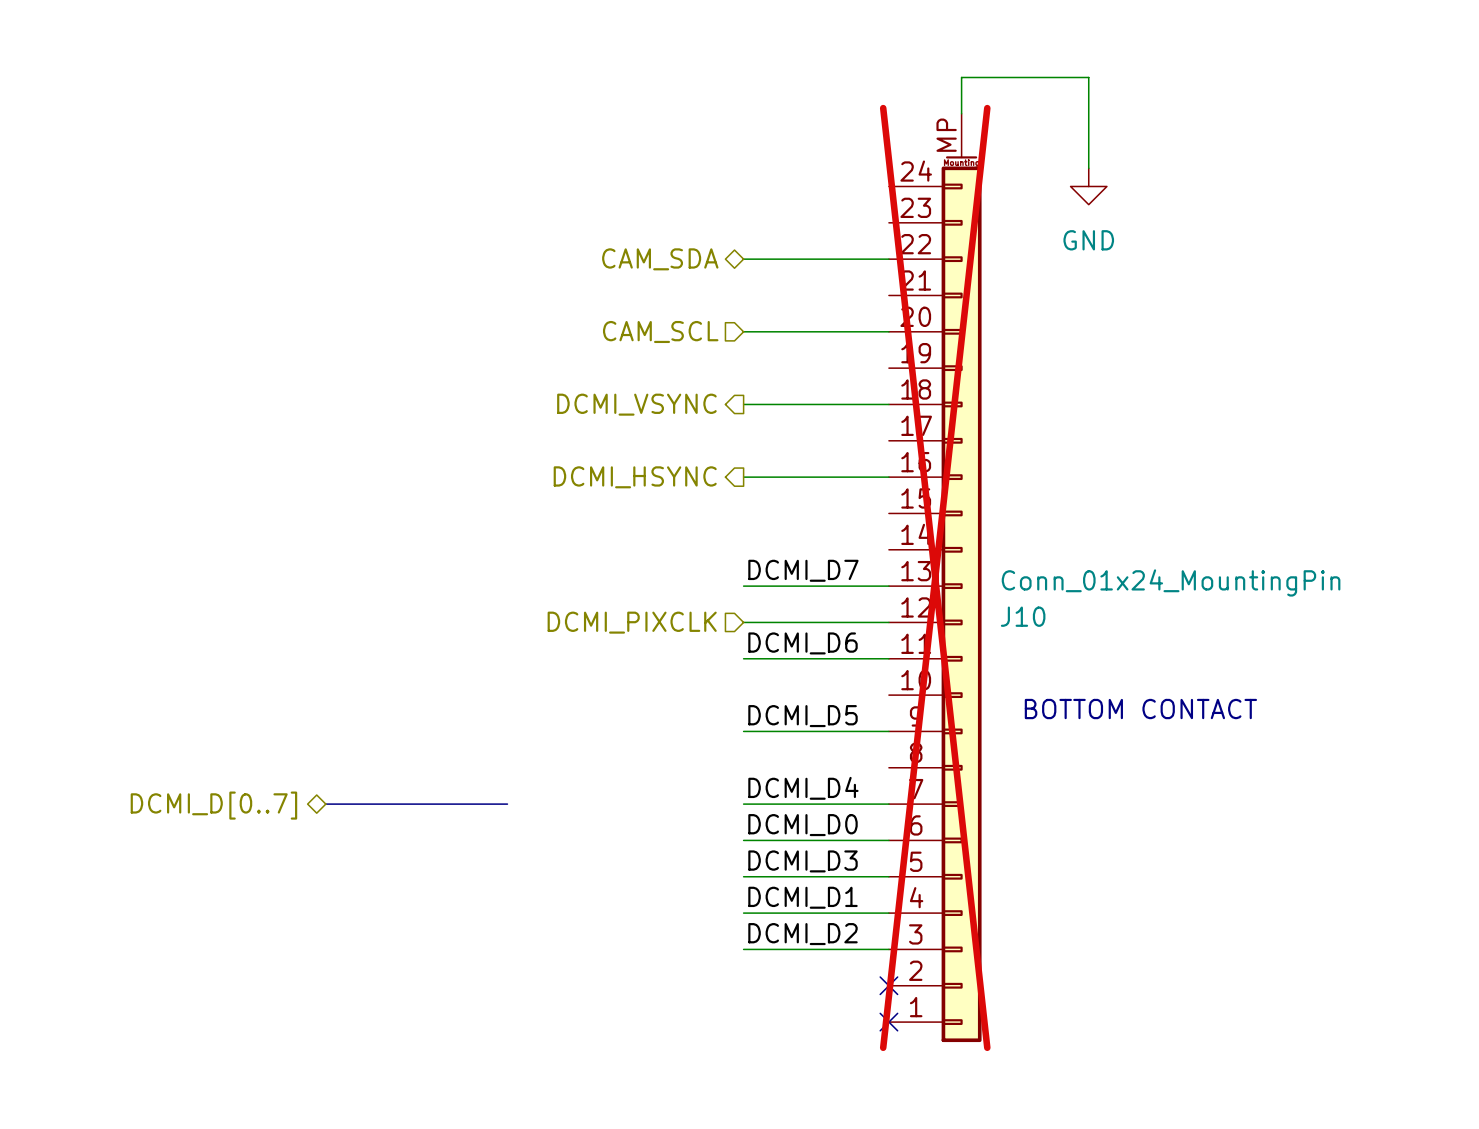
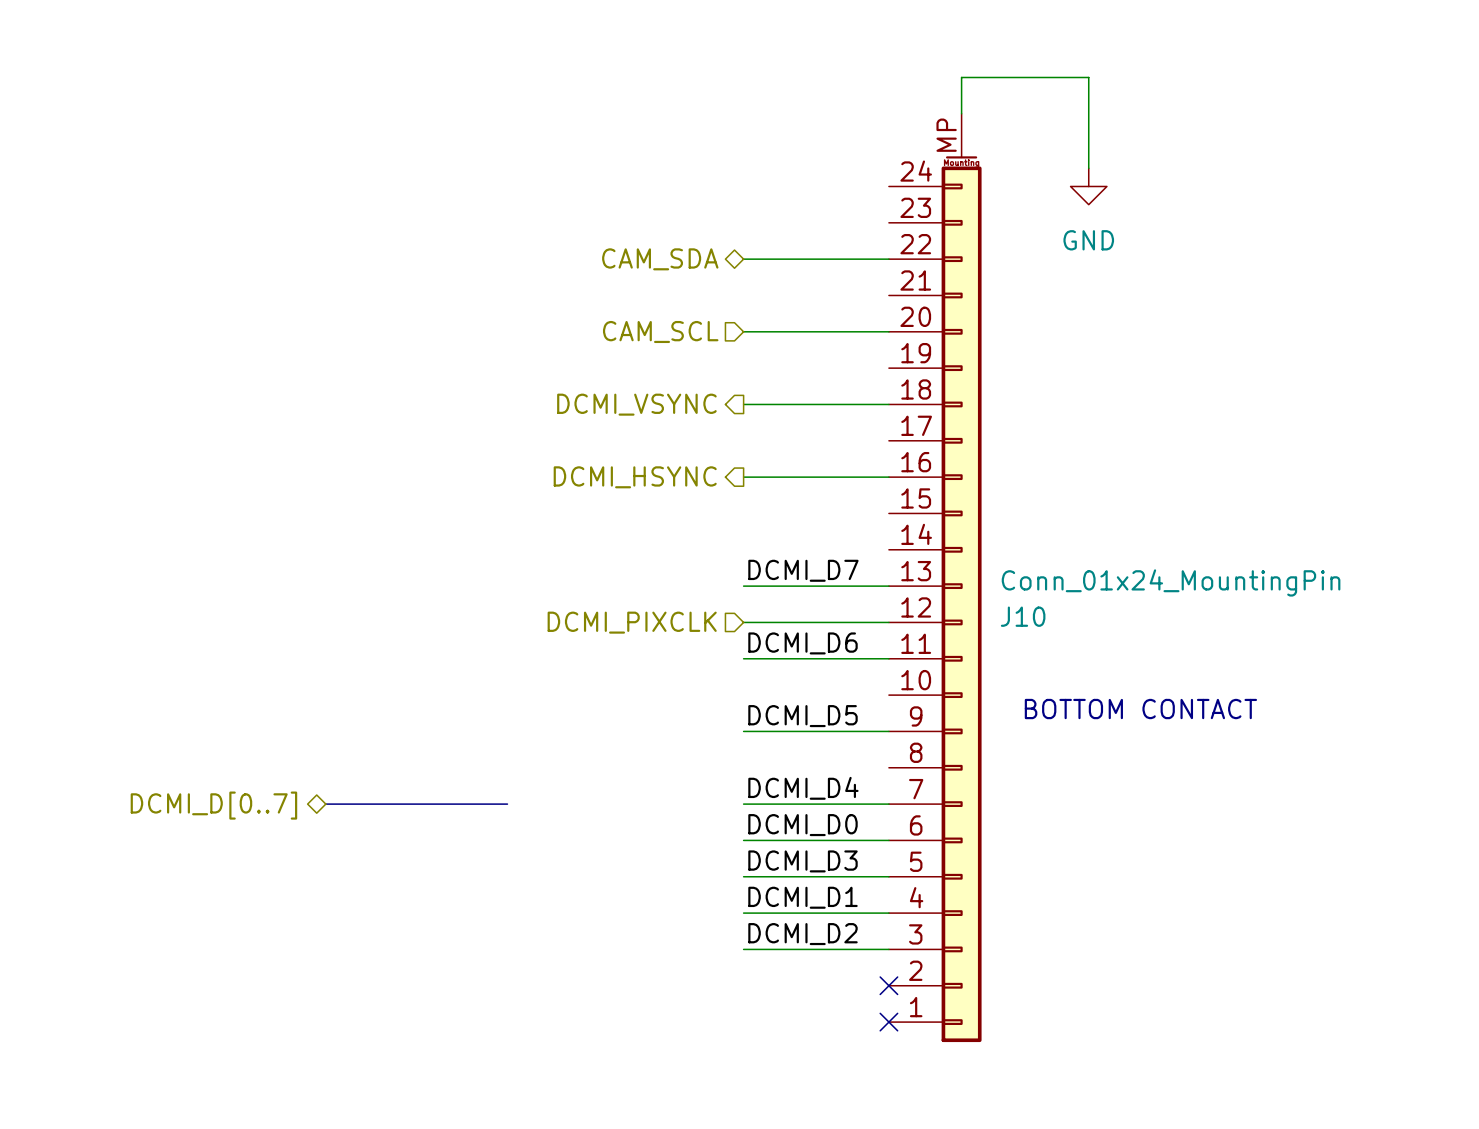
J10 do-not-place cross: (935, 577) -> none

